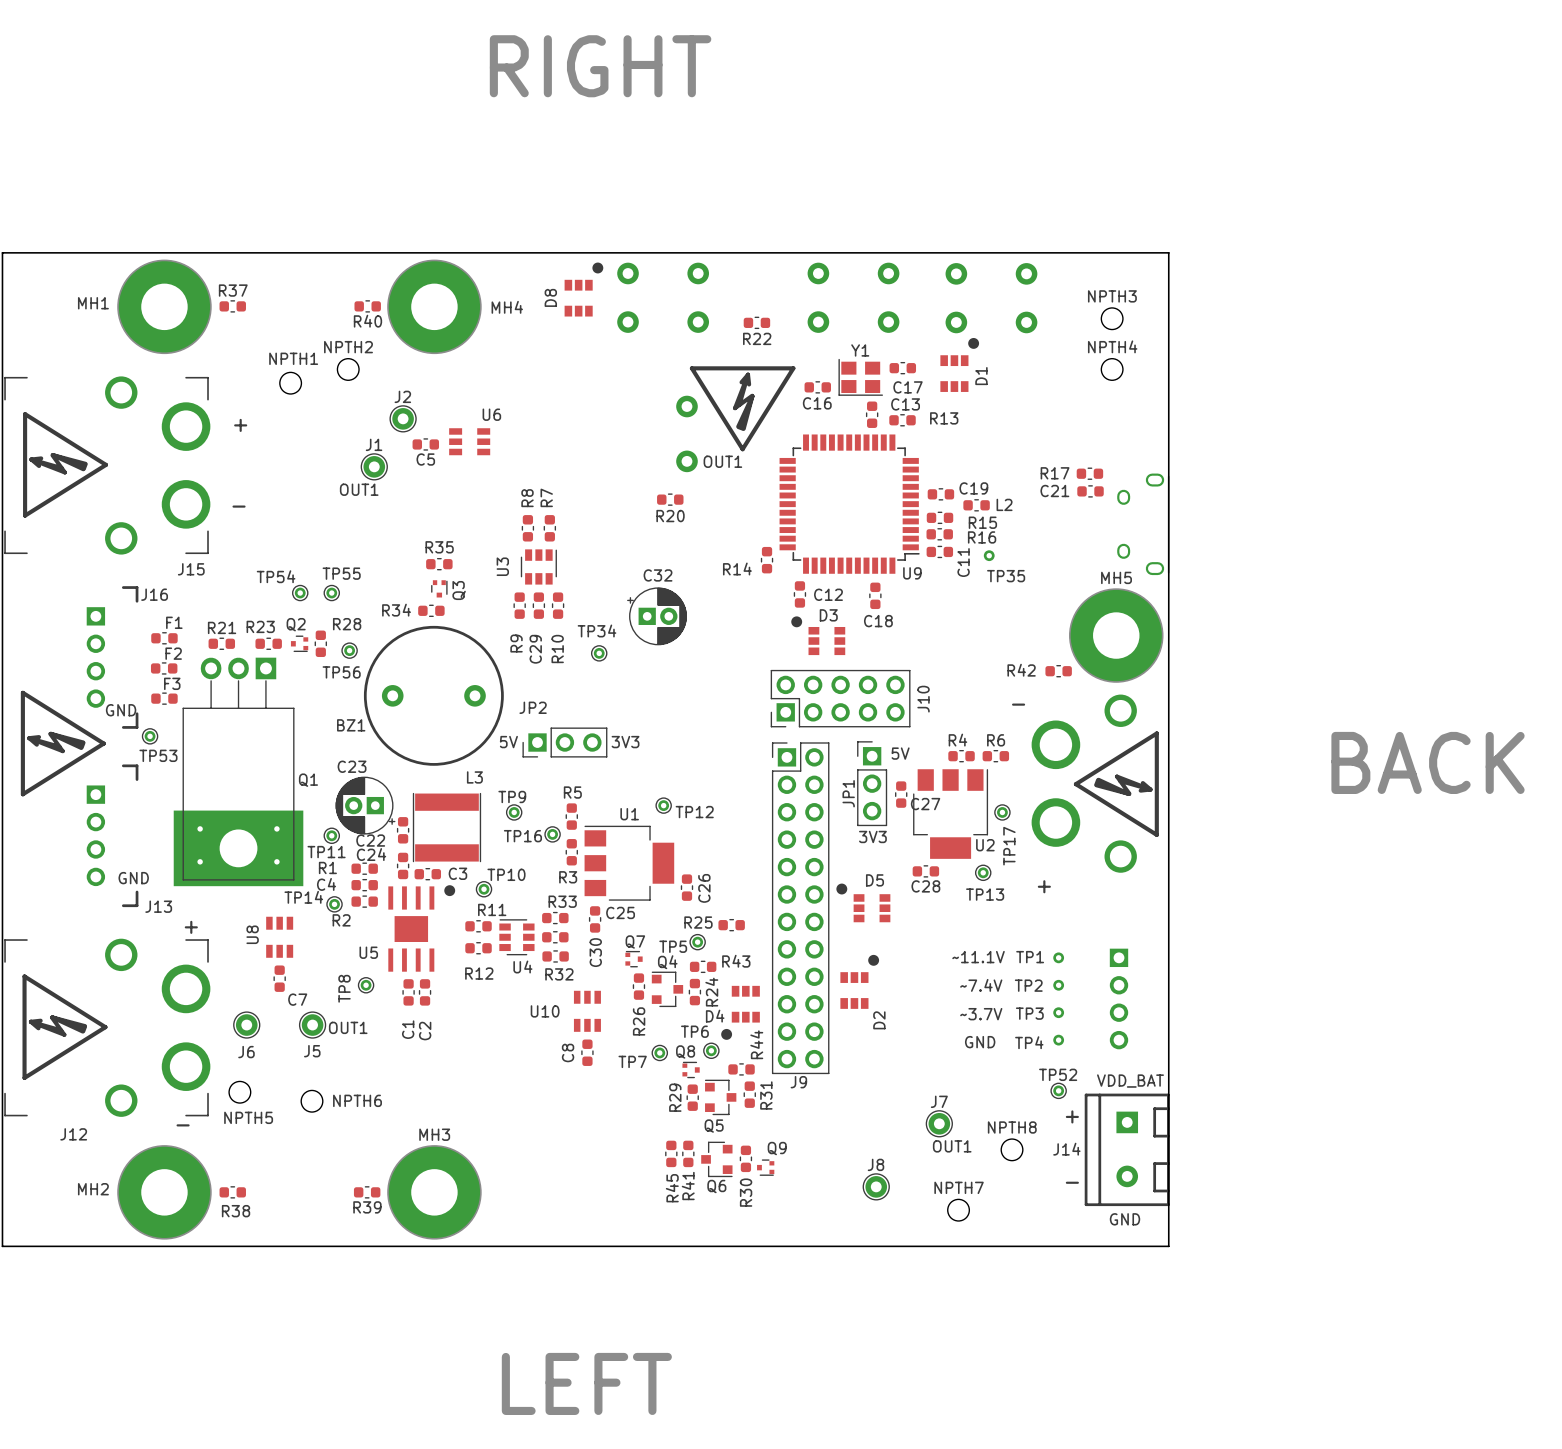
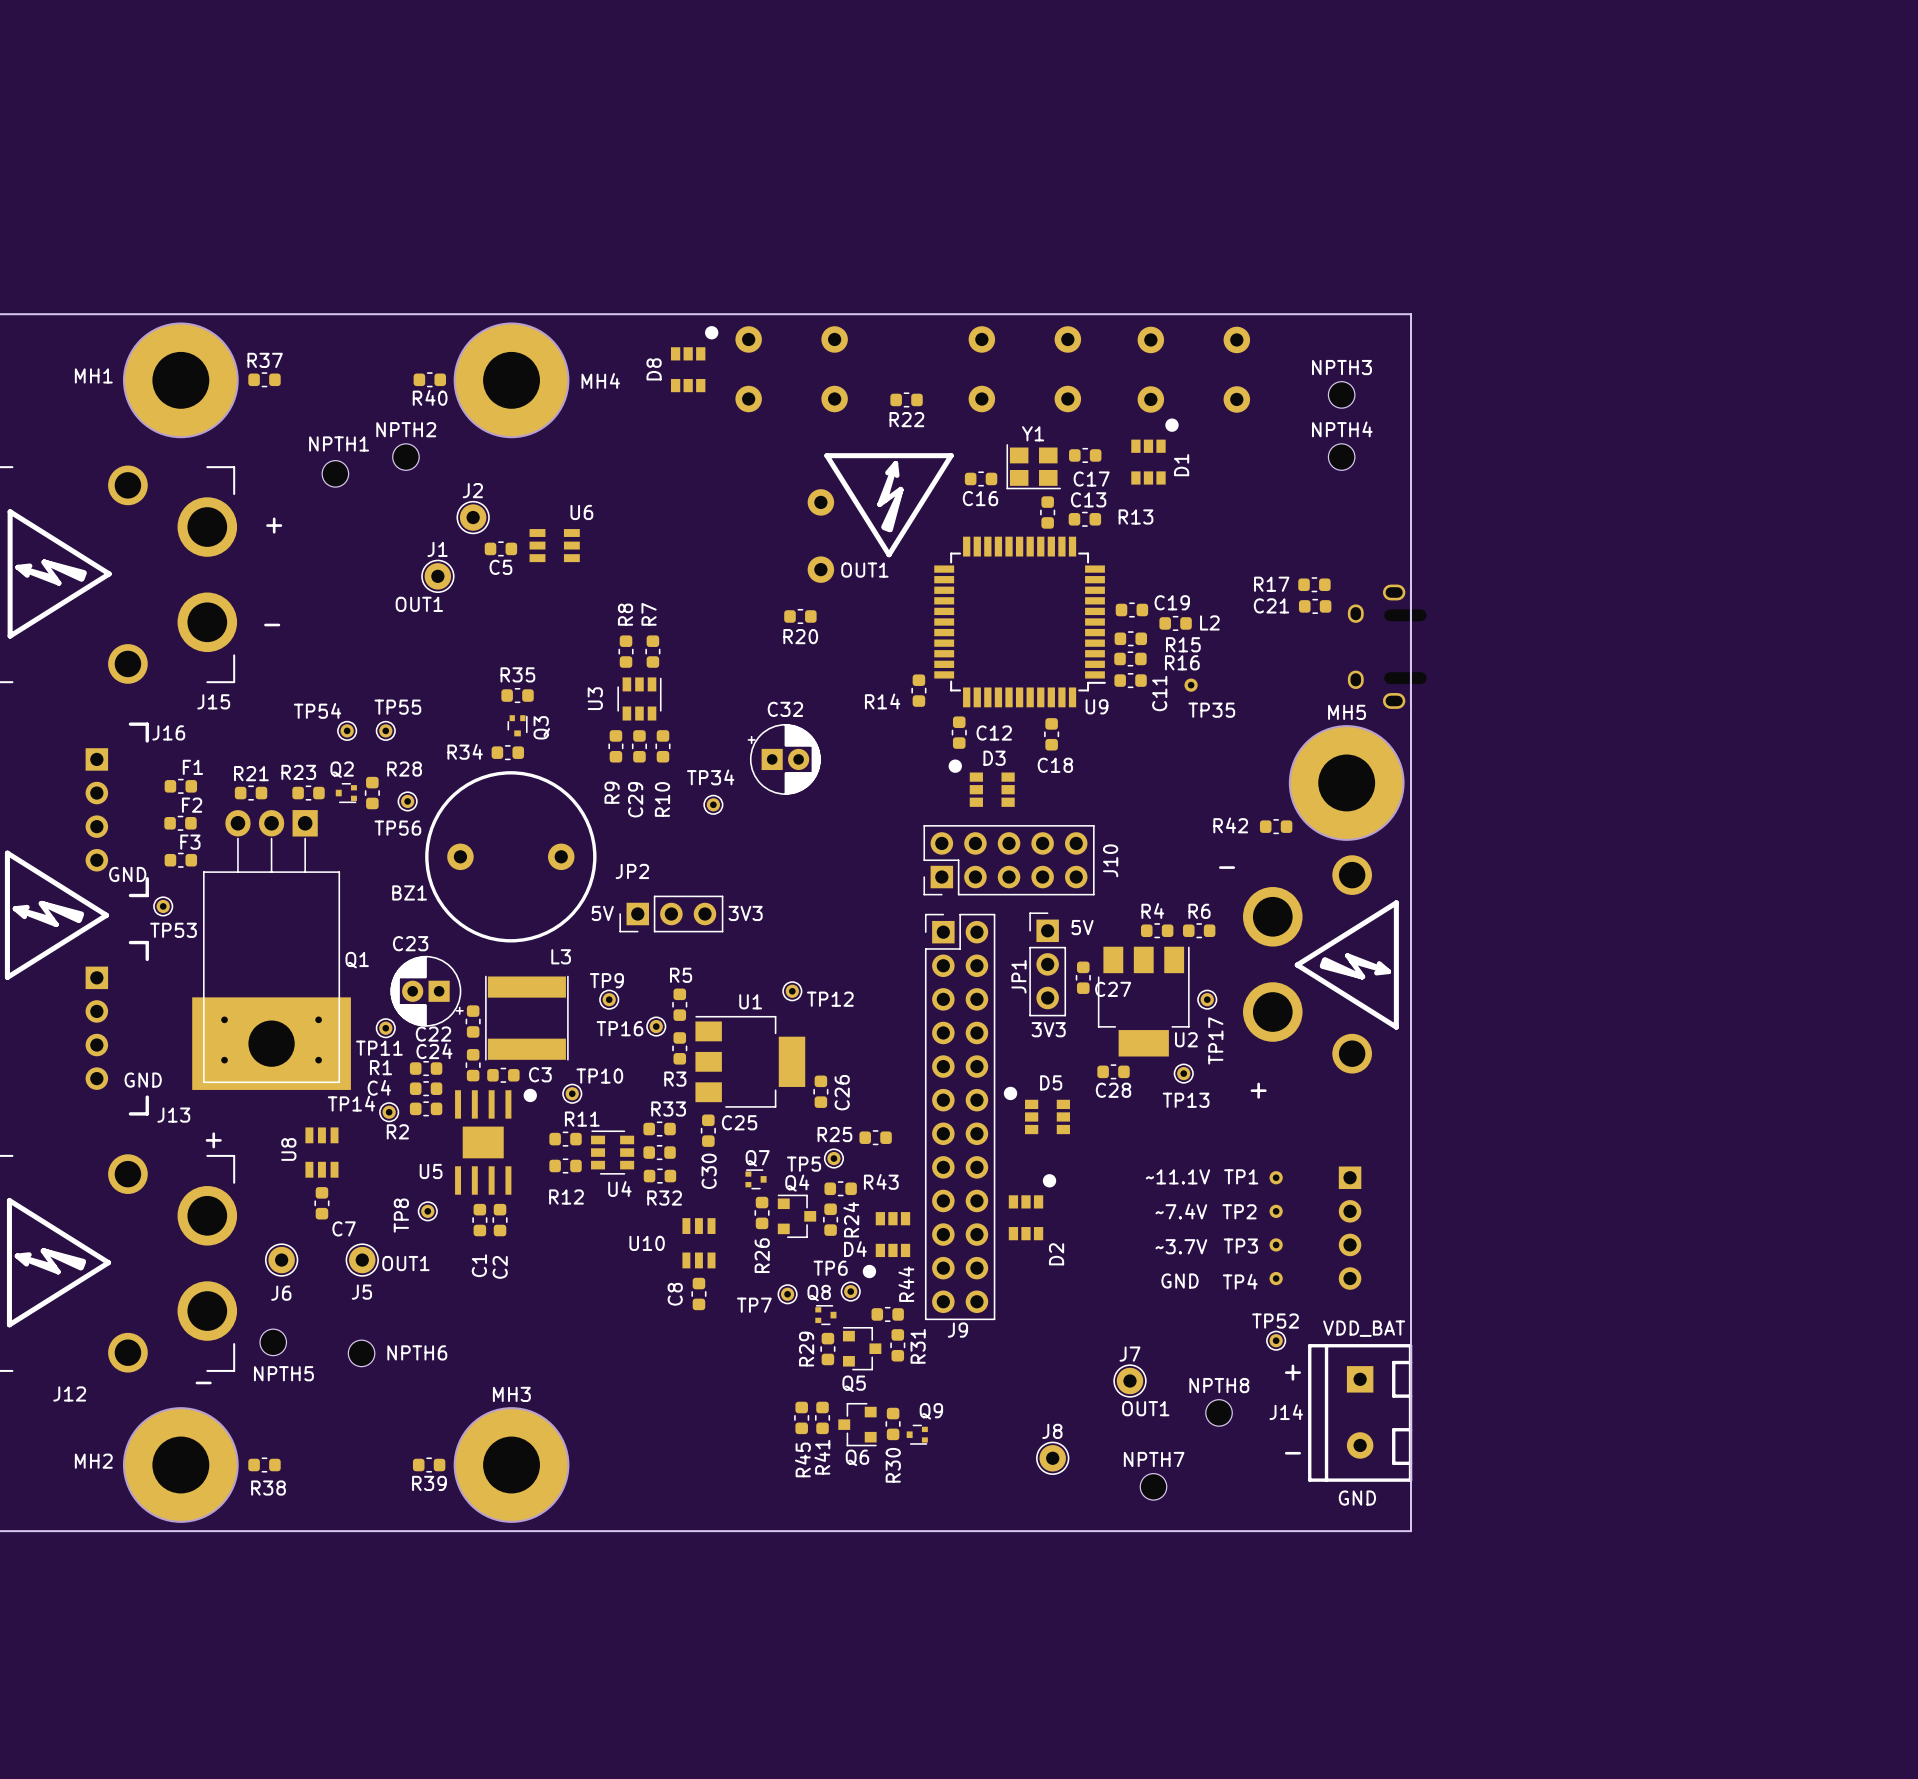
text: RIGHT (600, 66) -> none
text: BACK (1428, 762) -> none
text: LEFT (586, 1383) -> none

